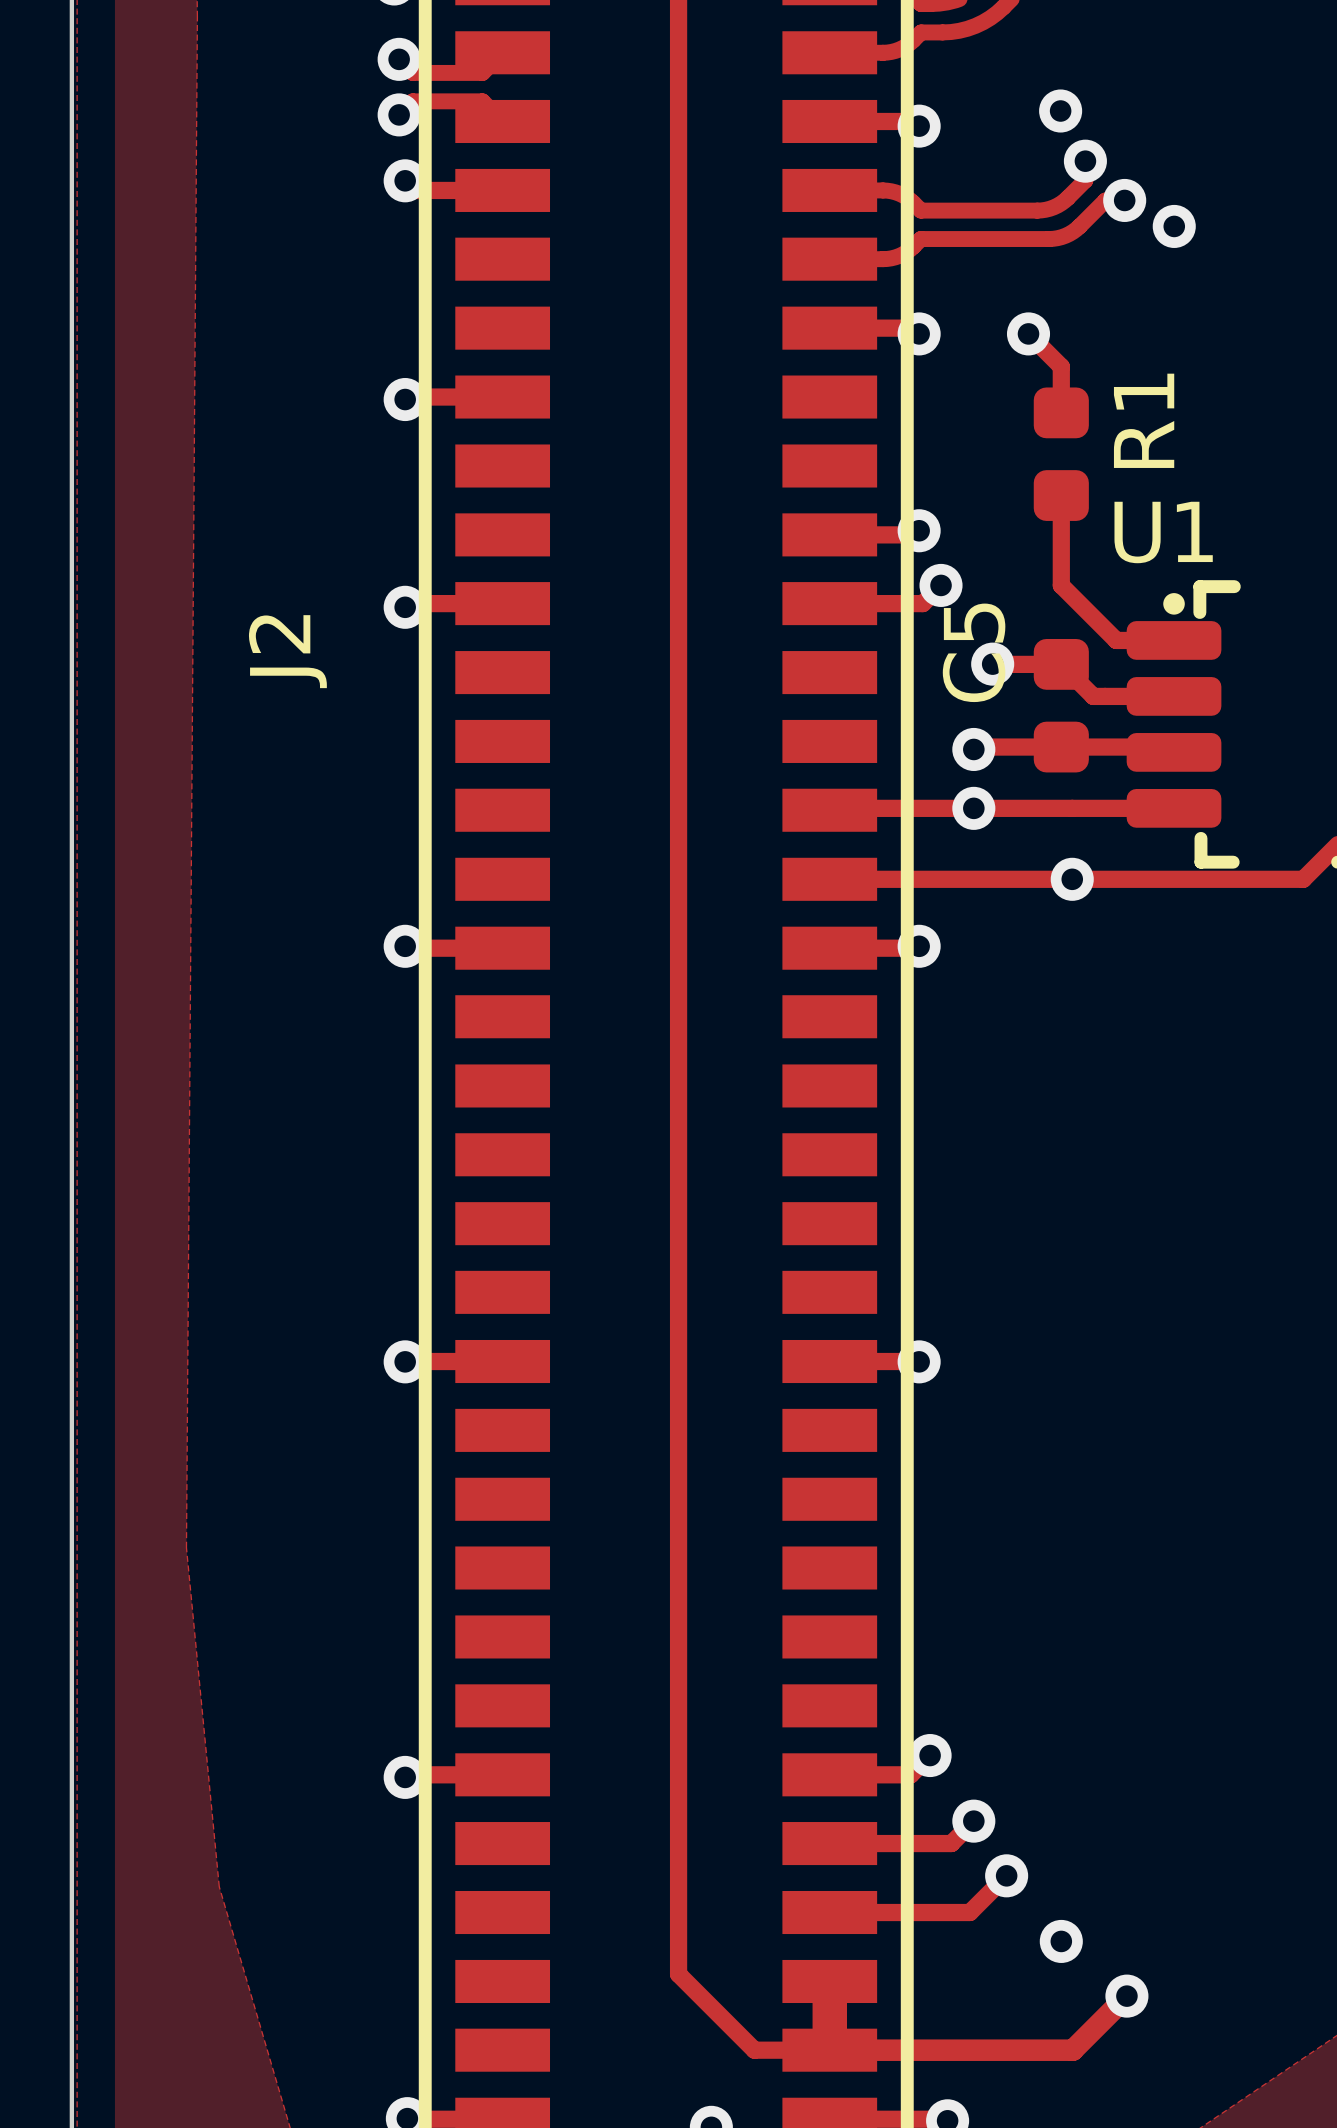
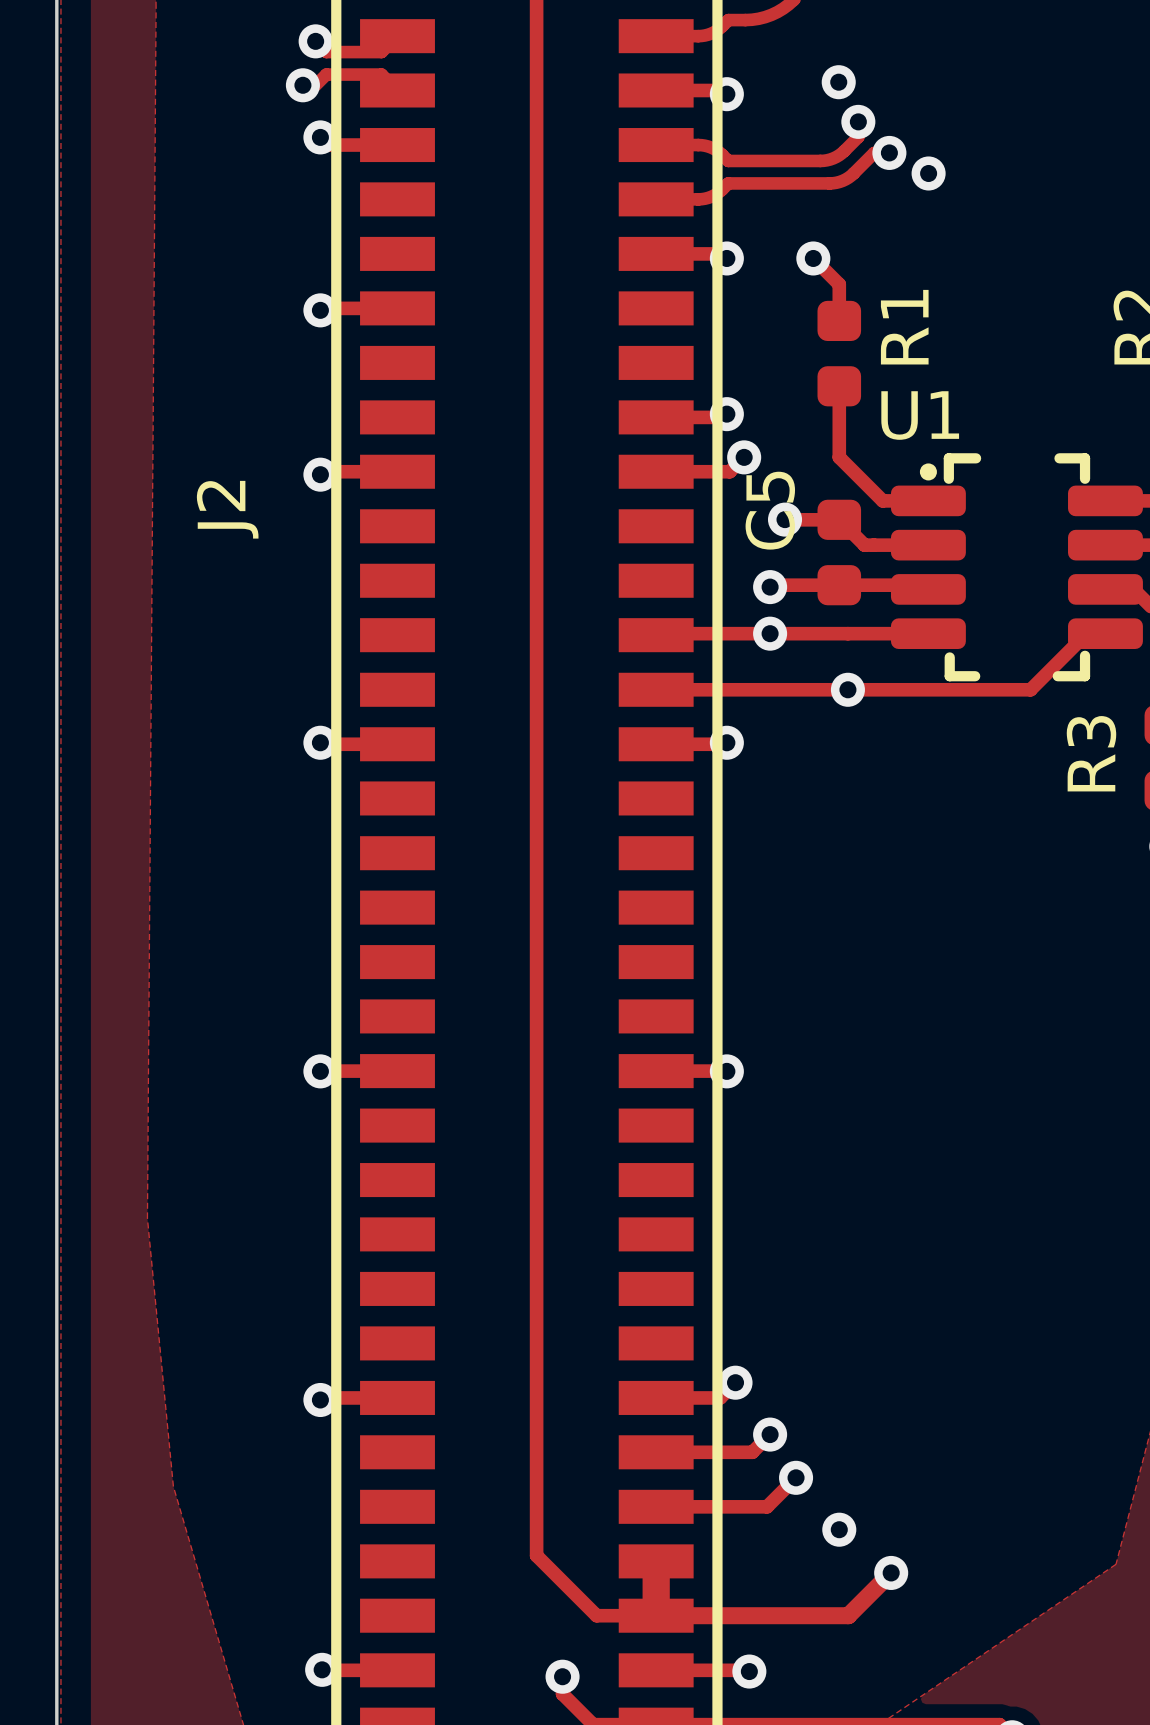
via position: (399, 114) -> (302, 85)

